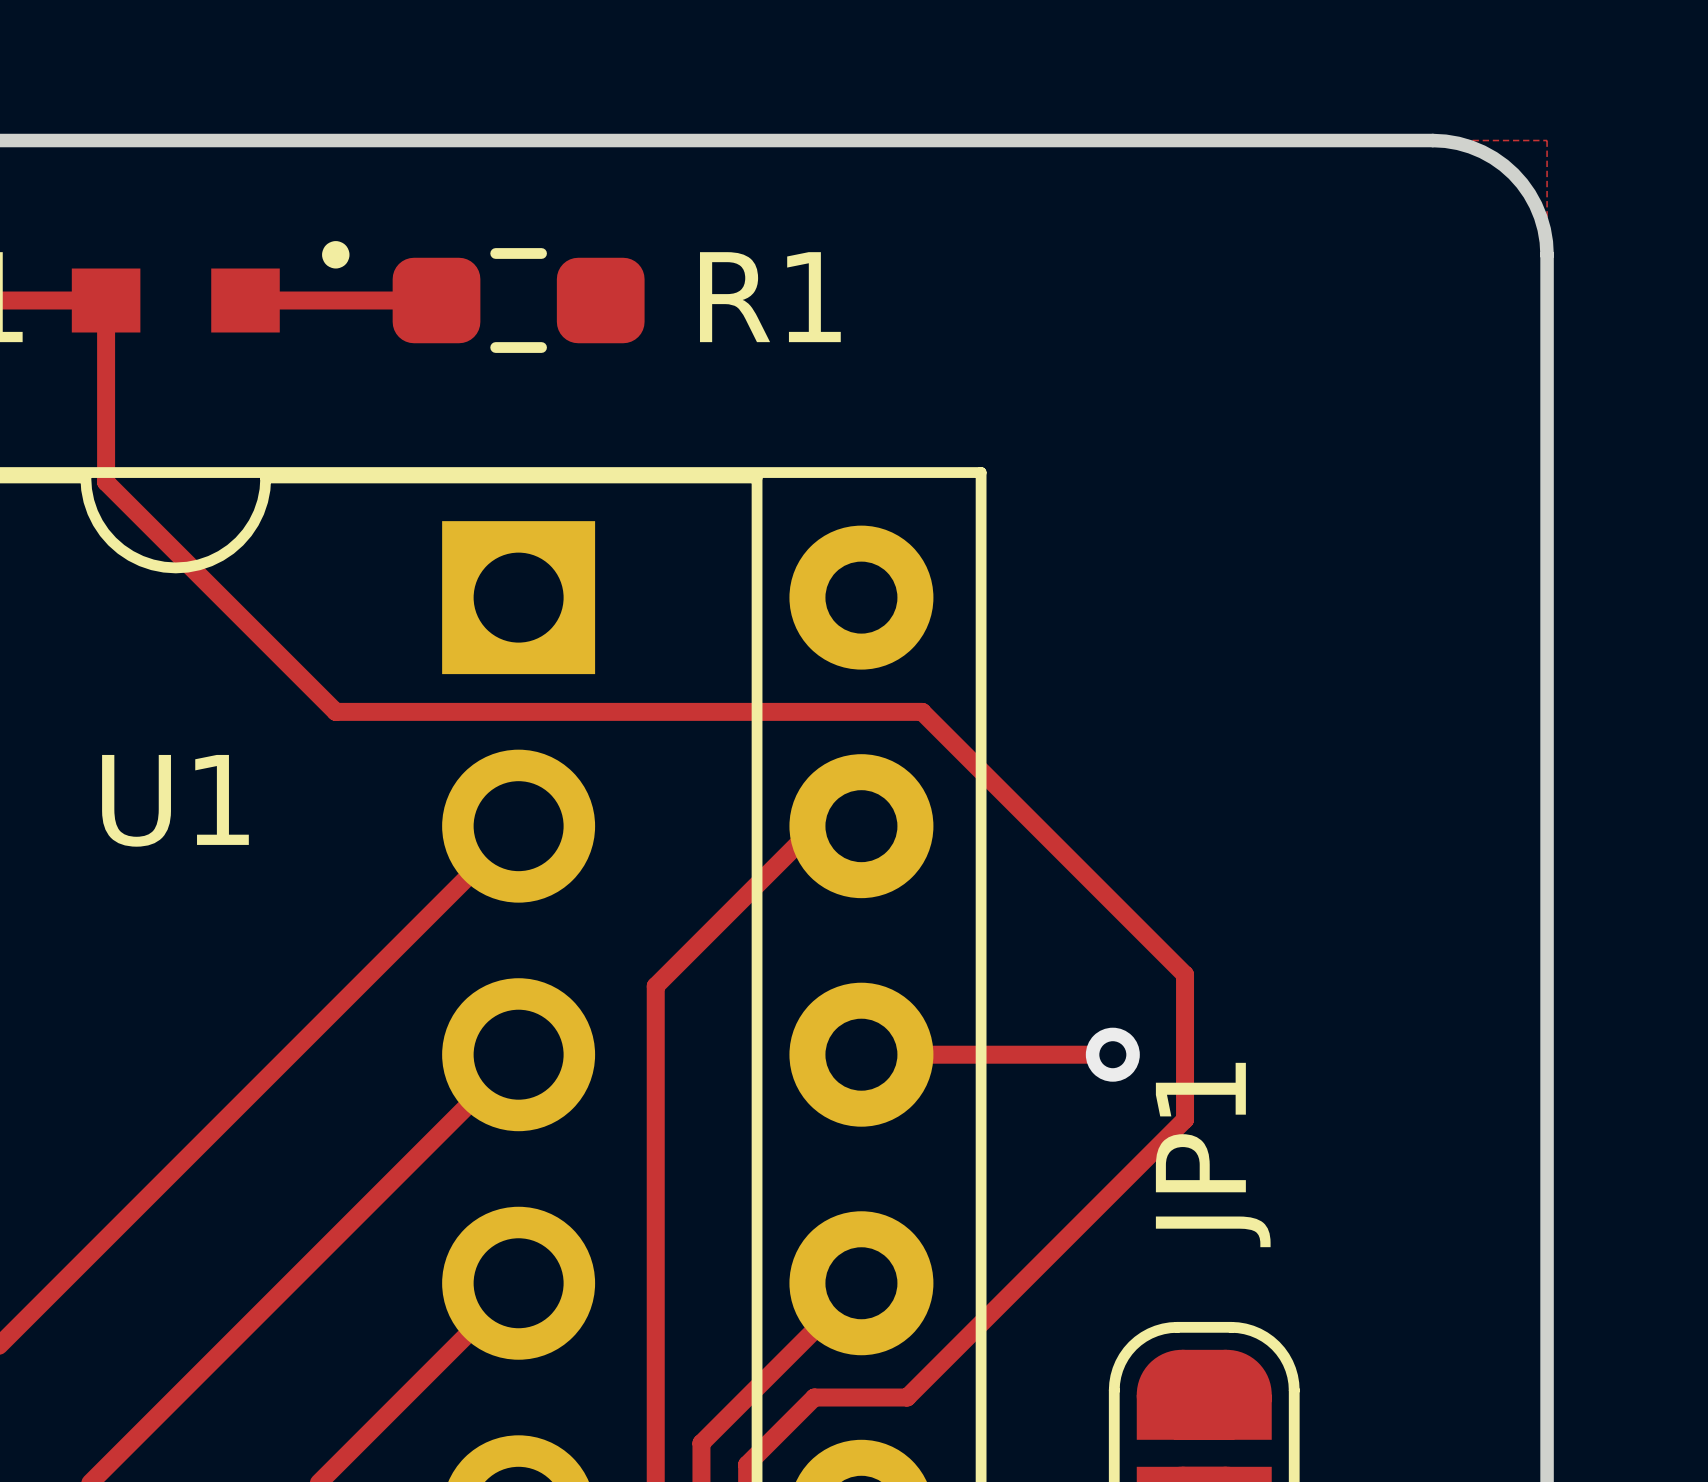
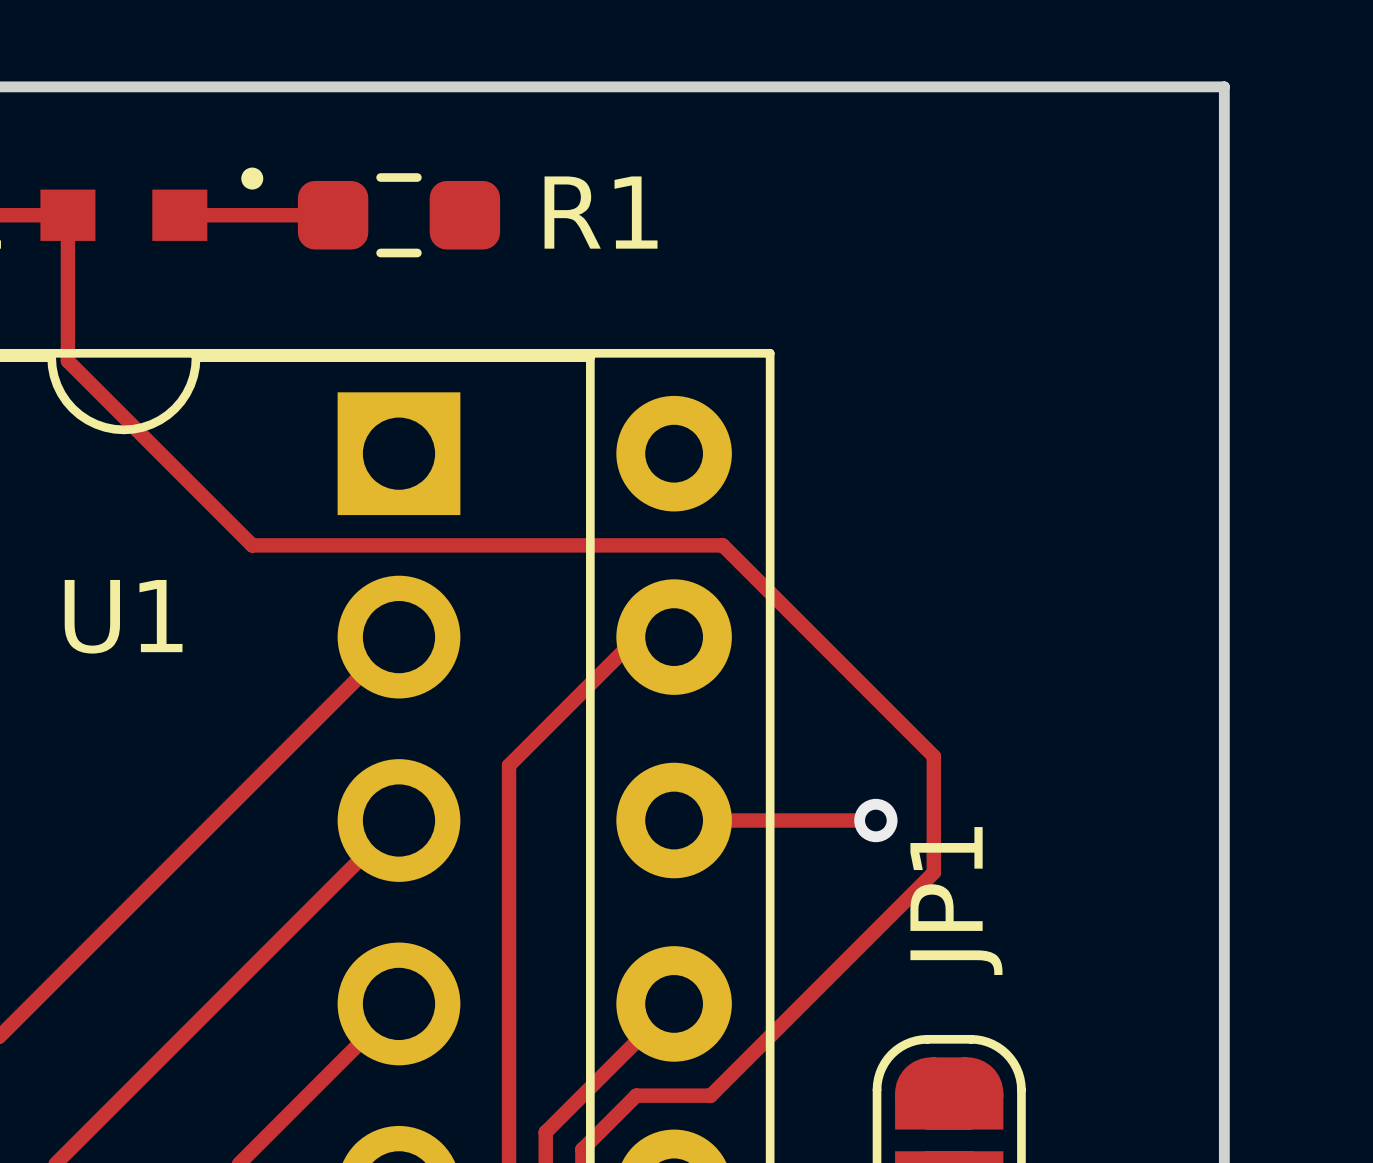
board edge: (1432, 140) (1458, 143) (1482, 151) (1513, 173) (1535, 205) (1544, 229) (1547, 254) -> (1132, 86) (1224, 86) (1224, 178)

